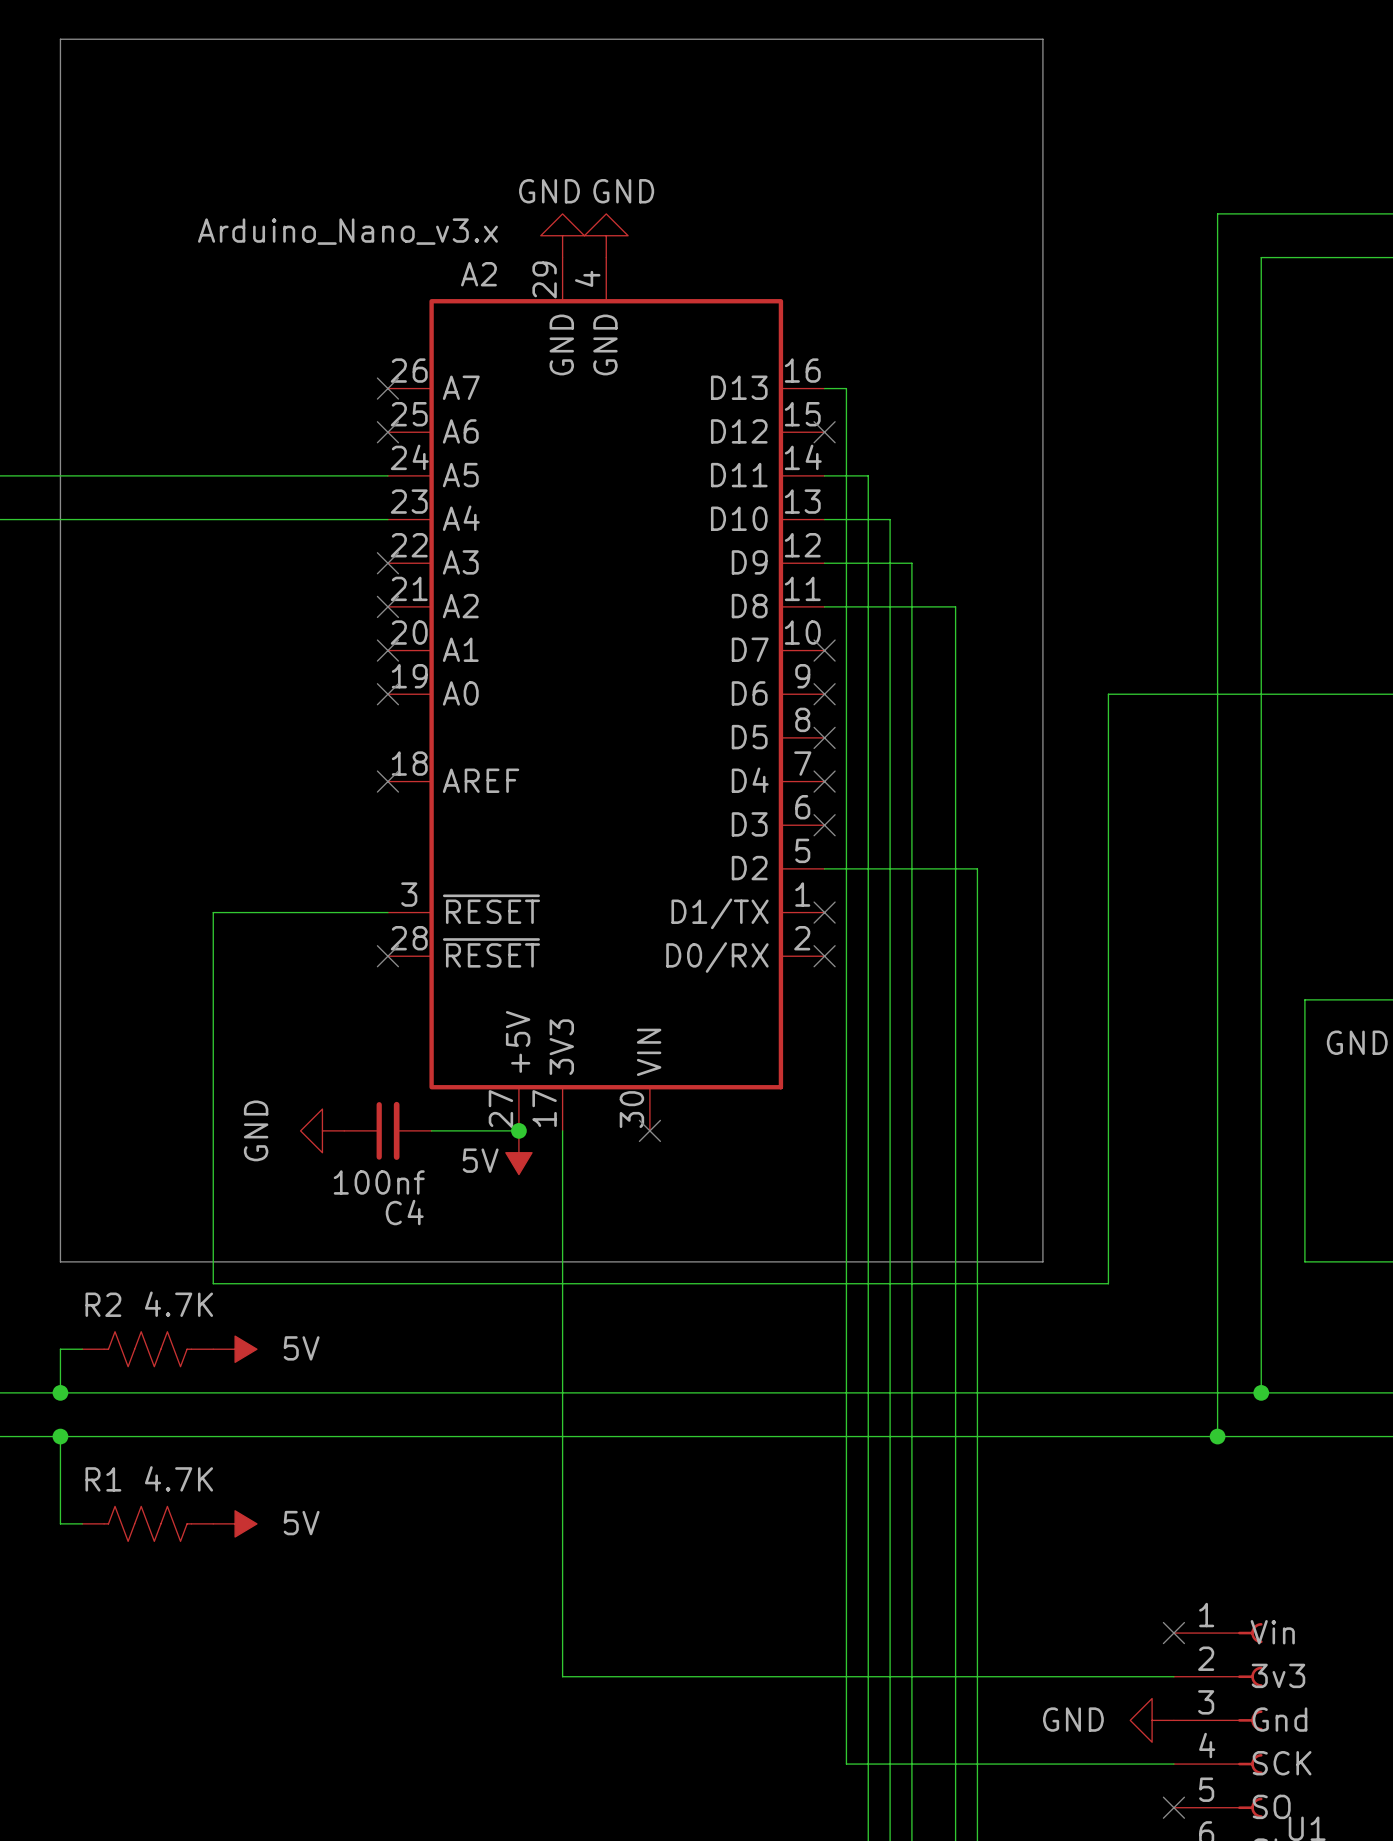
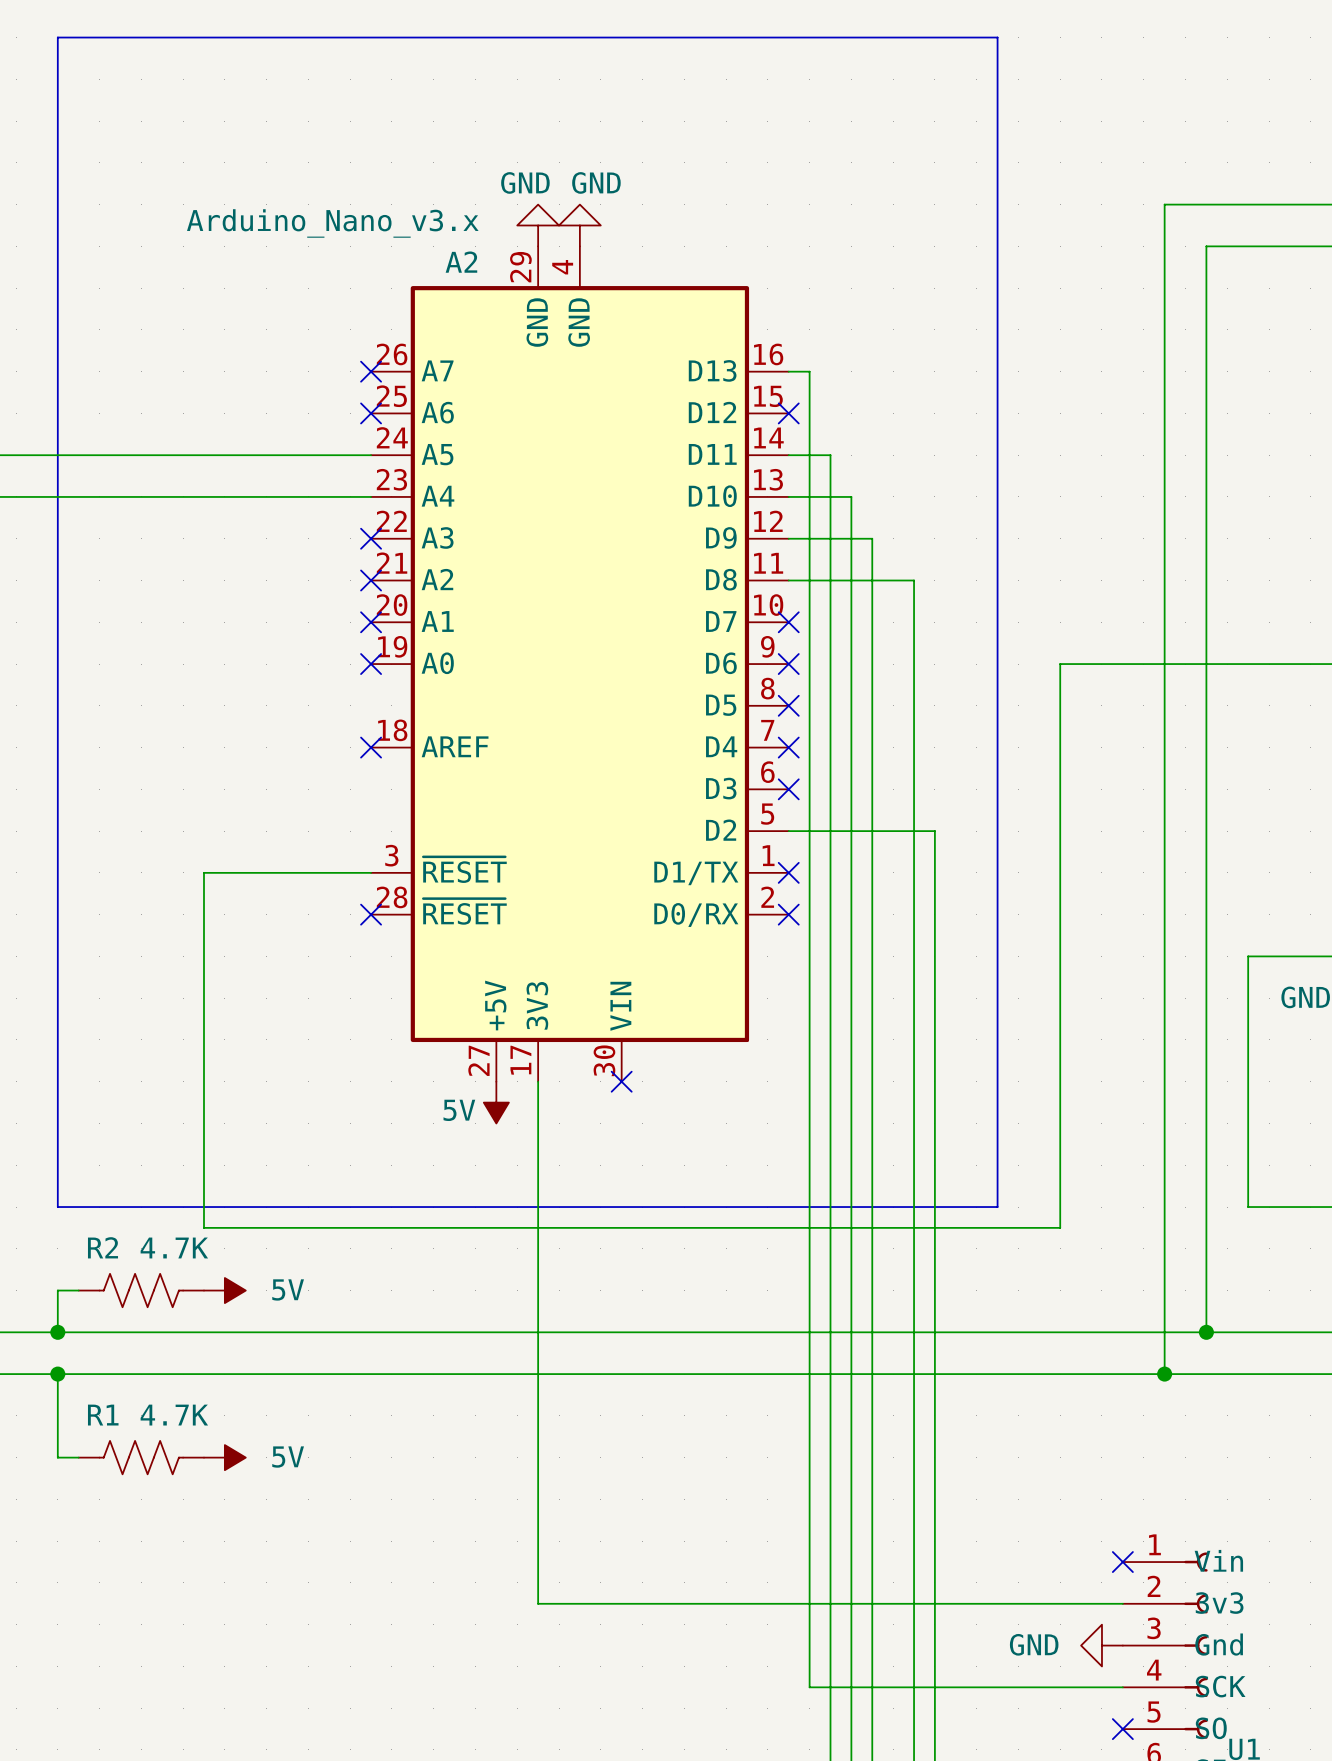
power symbol: GND (322, 1130) -> none
C4: 100nf (387, 1130) -> none
wire: (431, 1130) (518, 1130) -> none
junction: (518, 1130) -> none

